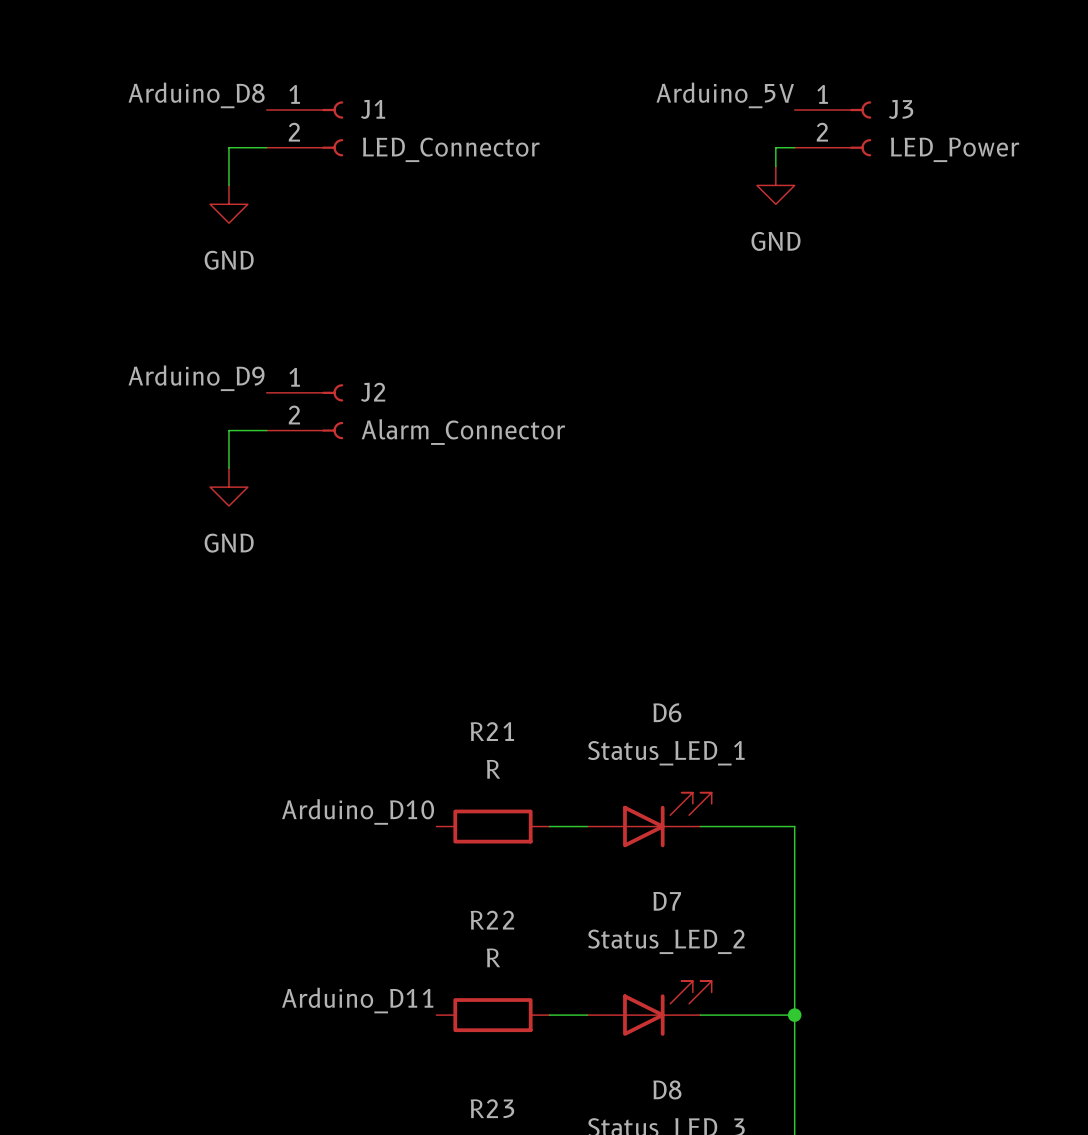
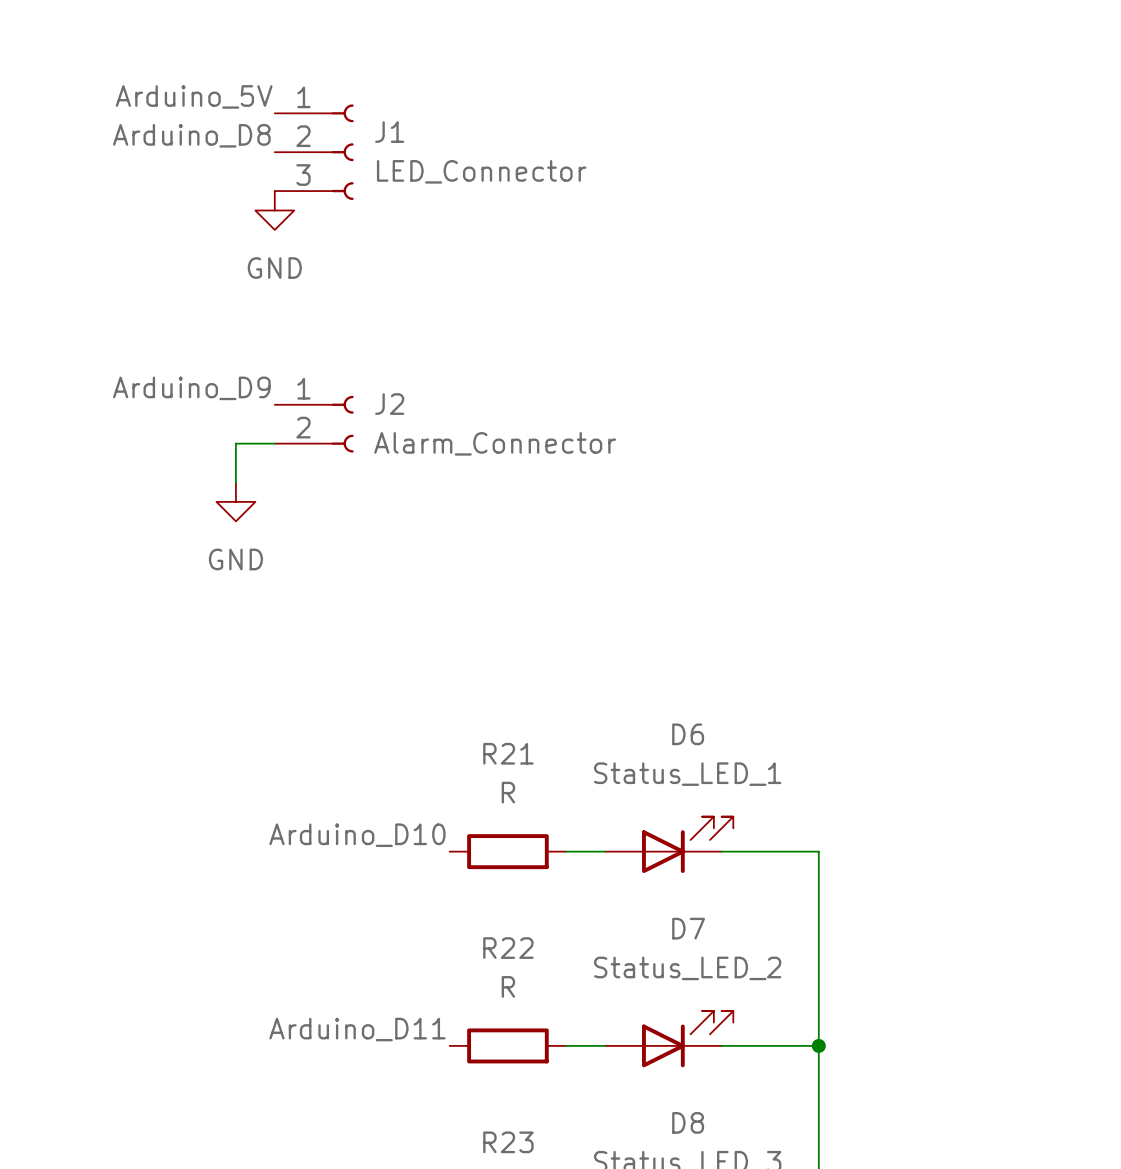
label: Arduino_D8 (196, 95) -> Arduino_5V (194, 96)
label: Arduino_5V (725, 95) -> none
J1 symbol: [266, 101, 344, 157] -> [274, 104, 354, 201]
J3: LED_Power (832, 128) -> none
label: none -> Arduino_D8 (191, 135)
wire: (266, 147) (228, 147) (228, 185) -> none
wire: (794, 147) (775, 147) (775, 166) -> none
power symbol: GND (775, 185) -> none
power symbol position: GND (228, 204) -> GND (274, 210)

